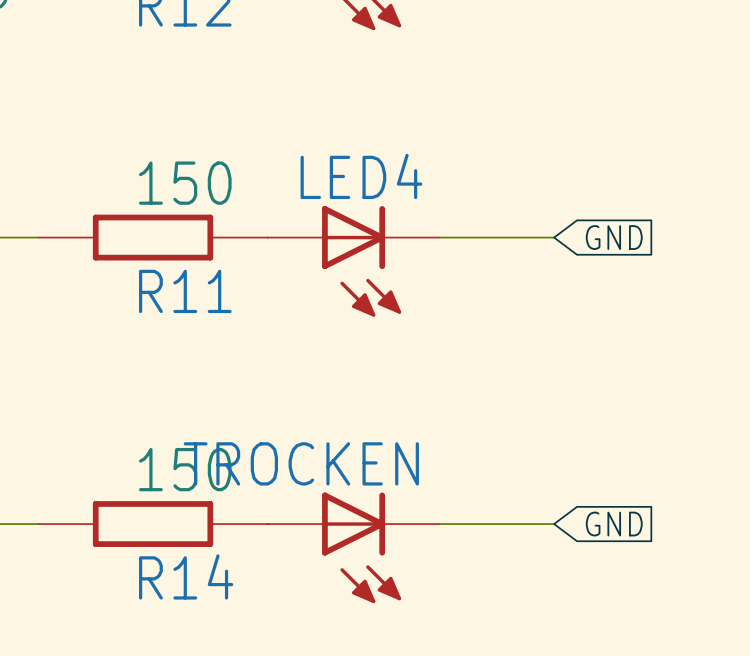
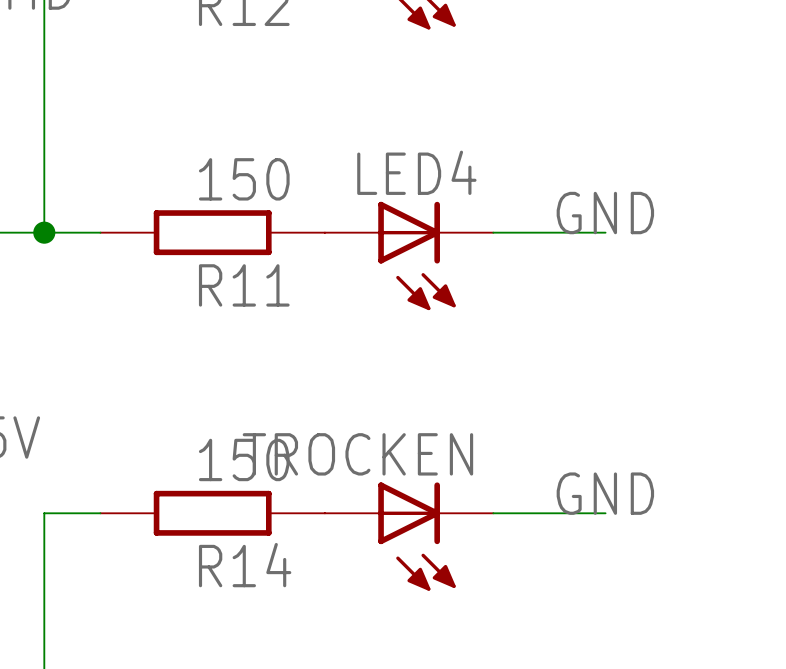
label: none -> GND (605, 213)
global label: GND (614, 237) -> none
label: none -> GND (605, 493)
global label: GND (614, 524) -> none

